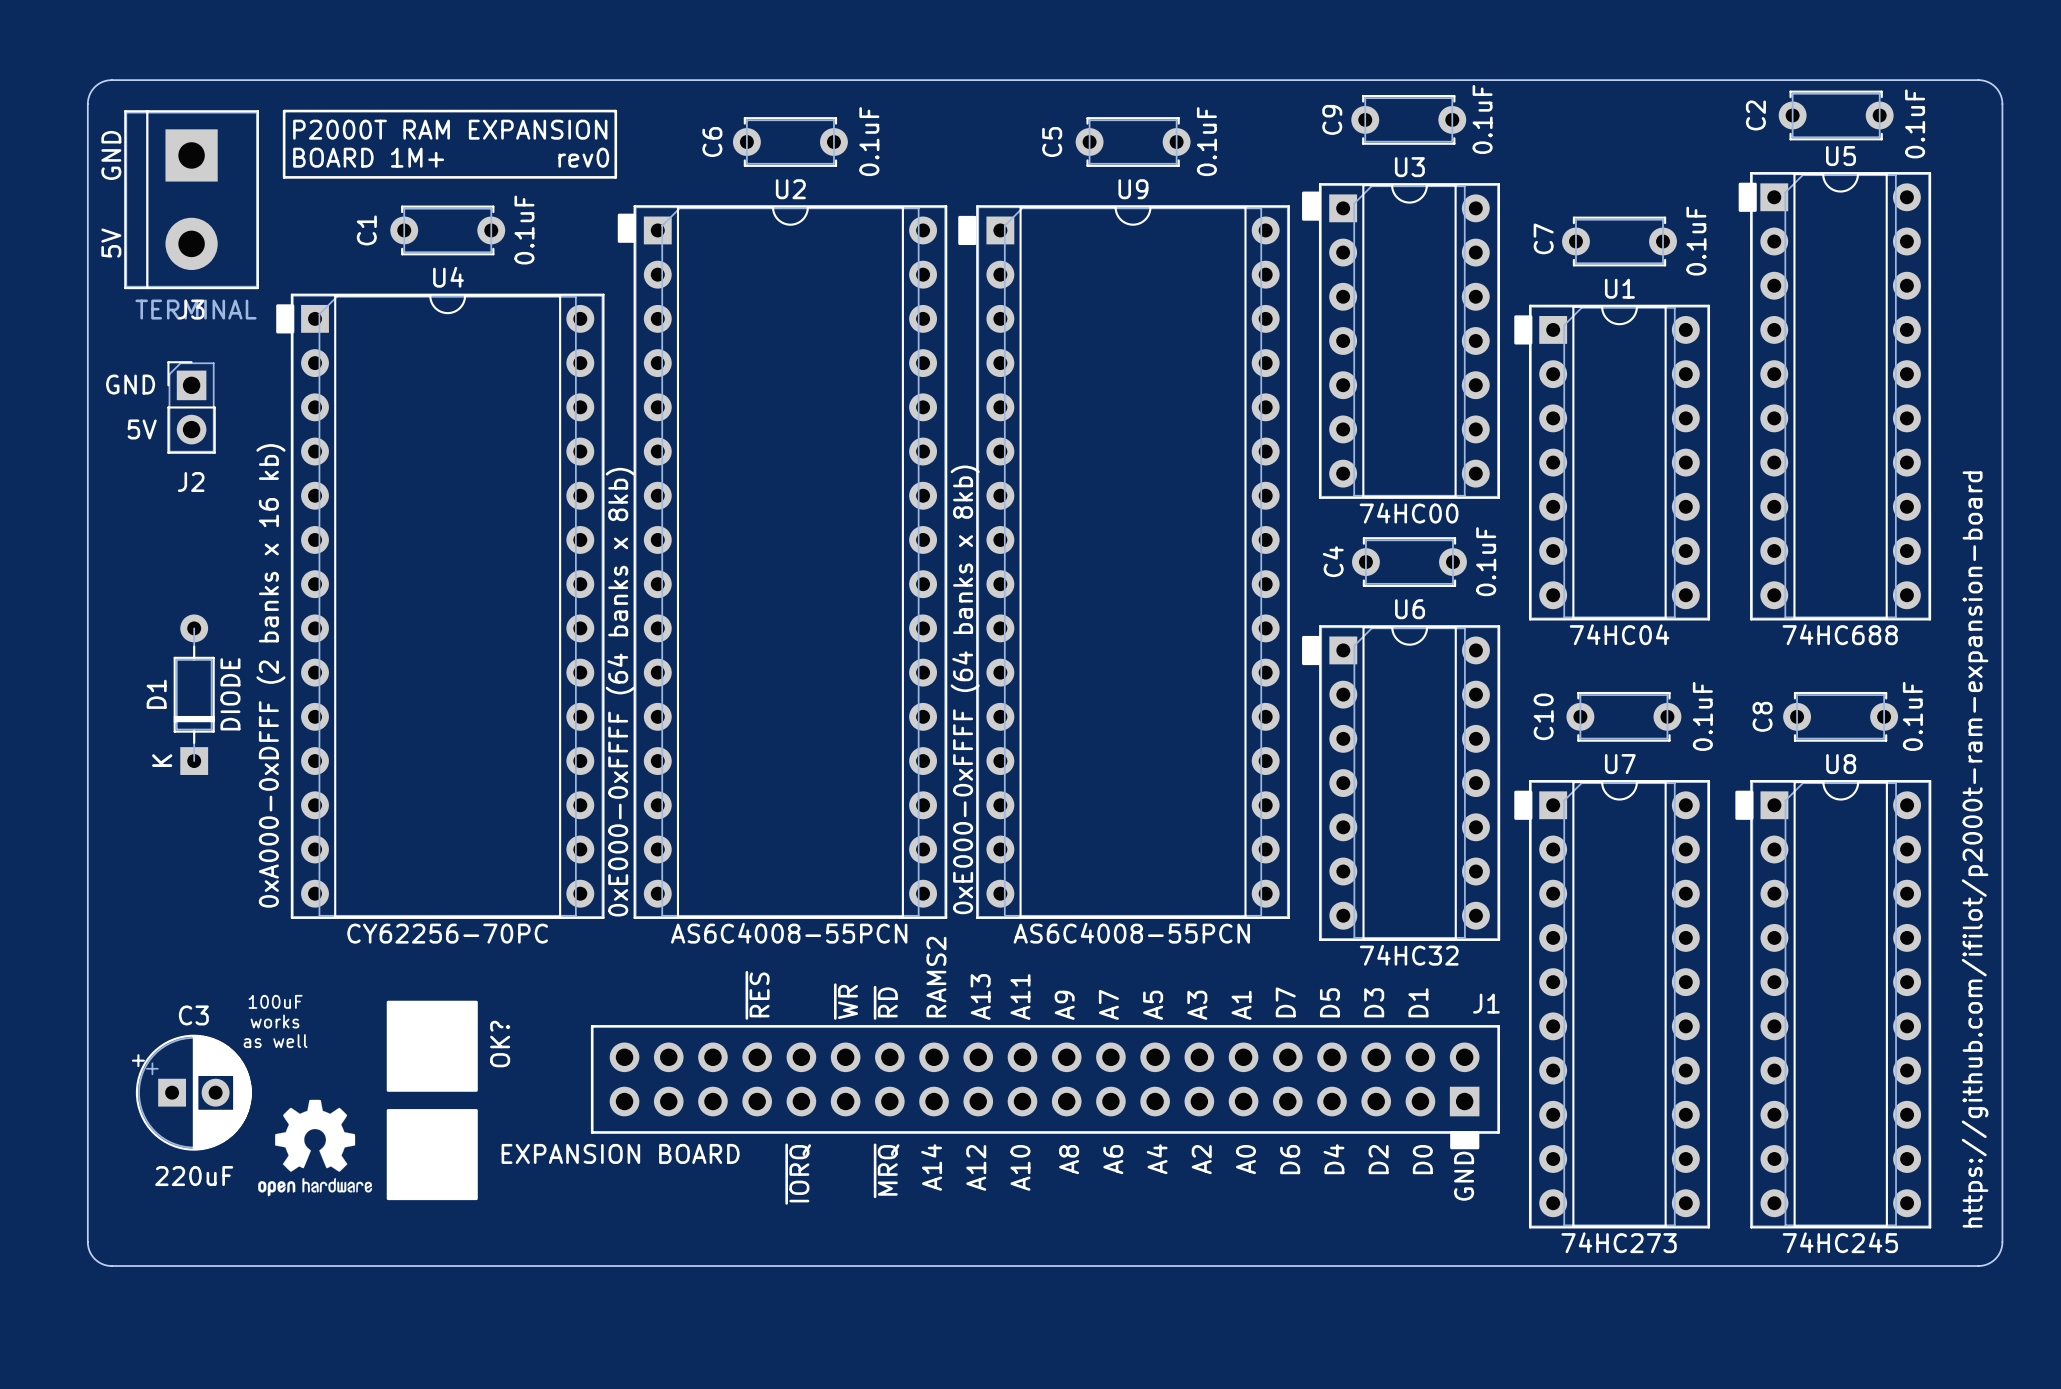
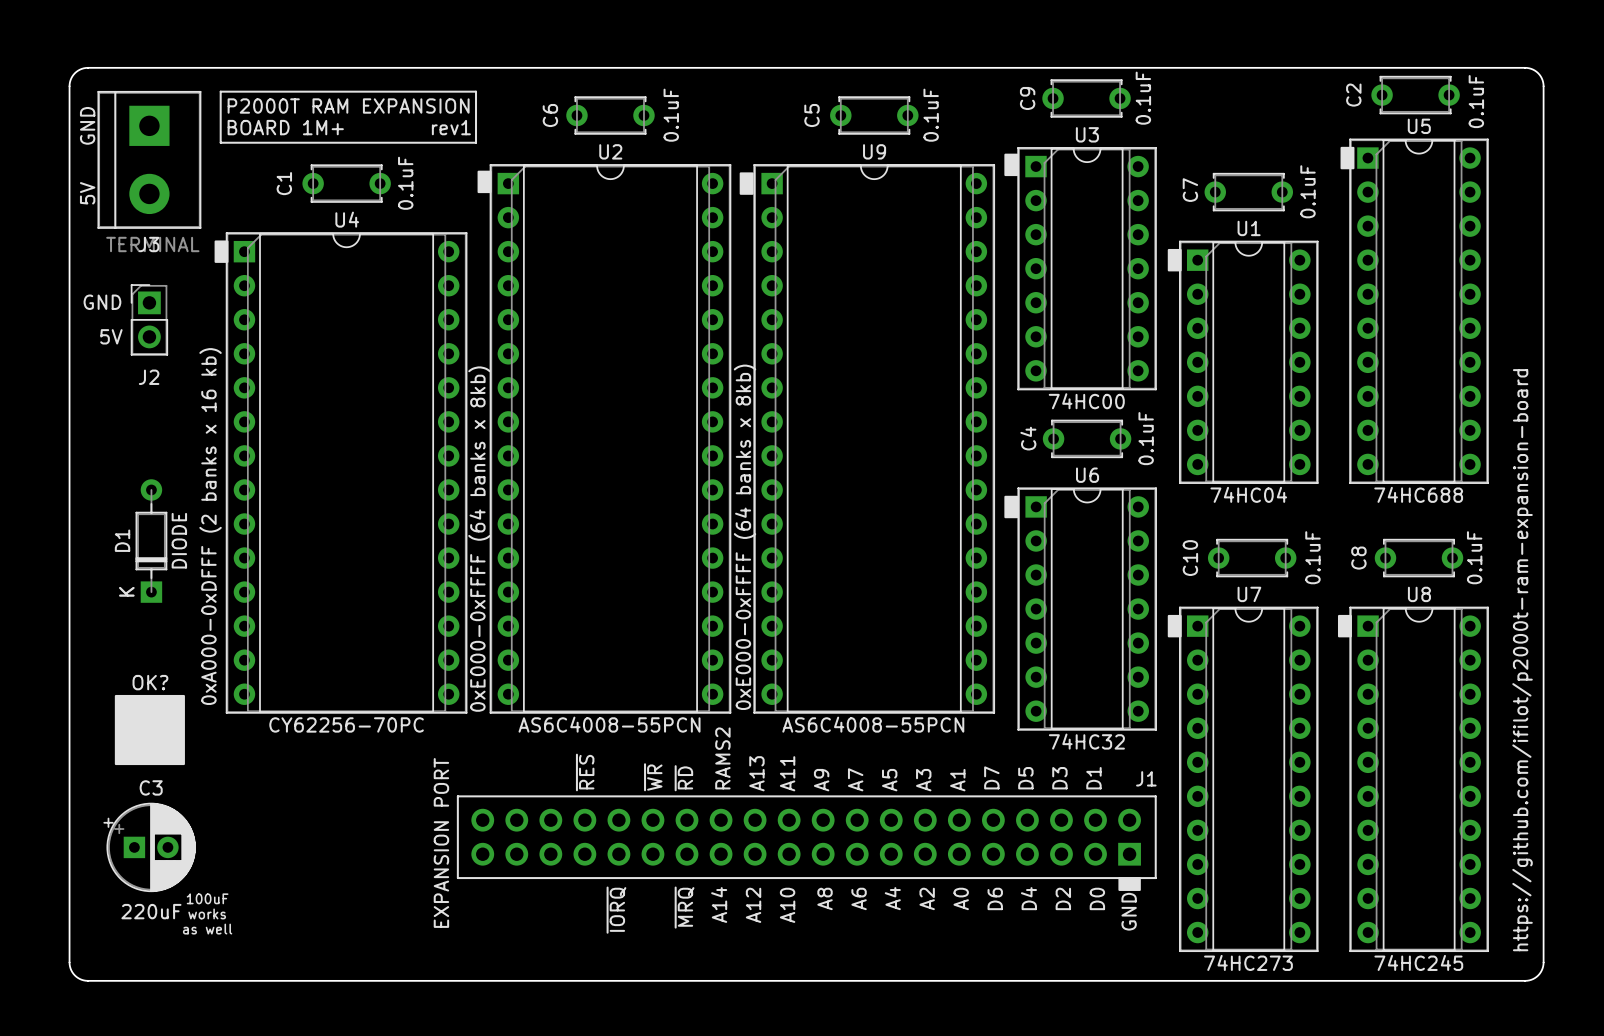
text: rev0 (583, 157) -> rev1 (451, 127)
drawing: none -> [114, 694, 185, 766]
drawing: [258, 1000, 478, 1201] -> none
text position: 100uF (275, 1001) -> 100uF (207, 898)
text position: works (275, 1021) -> works (207, 913)
text position: as well (275, 1041) -> as well (207, 929)
text rotation: 0° (500, 1044) -> 90° clockwise (150, 682)
text position: OK? (500, 1044) -> OK? (150, 682)
J1 value: EXPANSION BOARD (620, 1153) -> EXPANSION PORT (441, 842)

